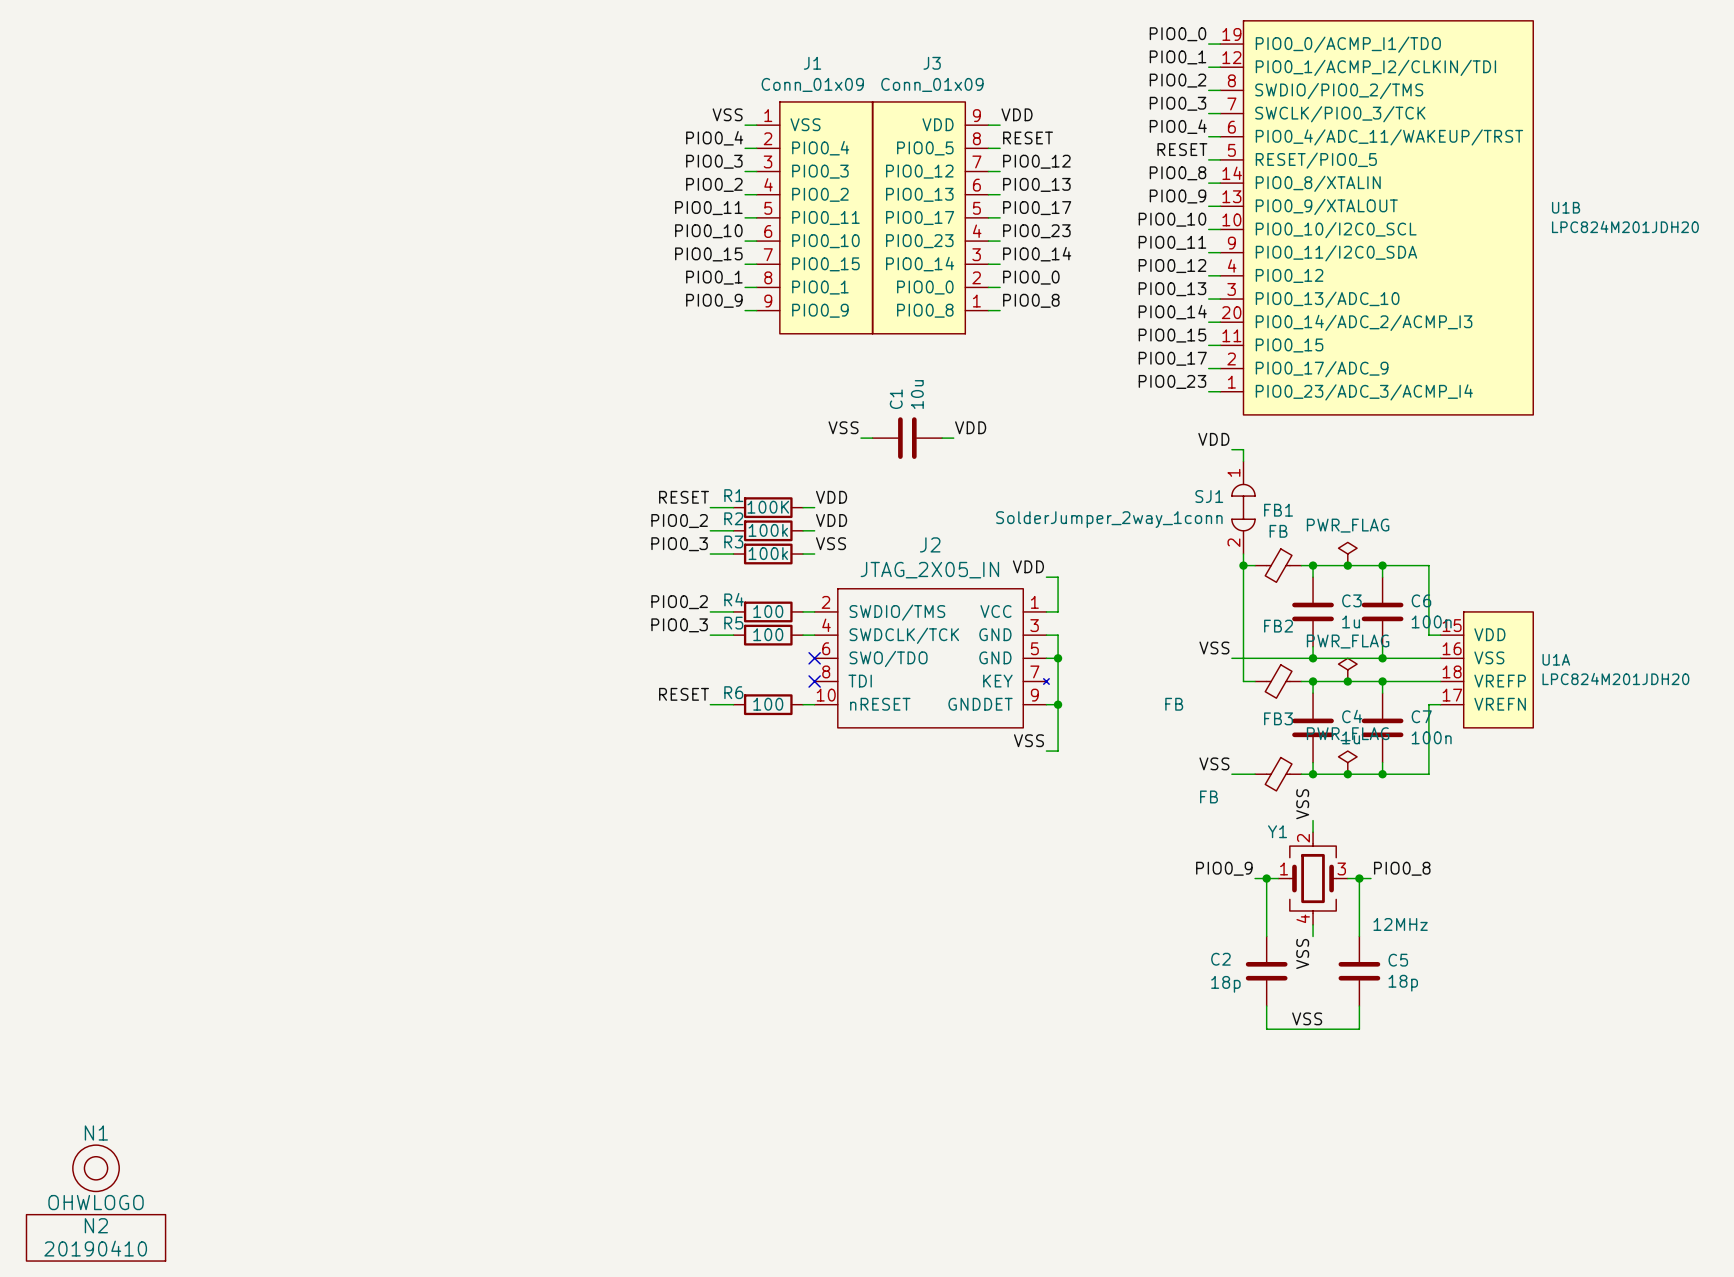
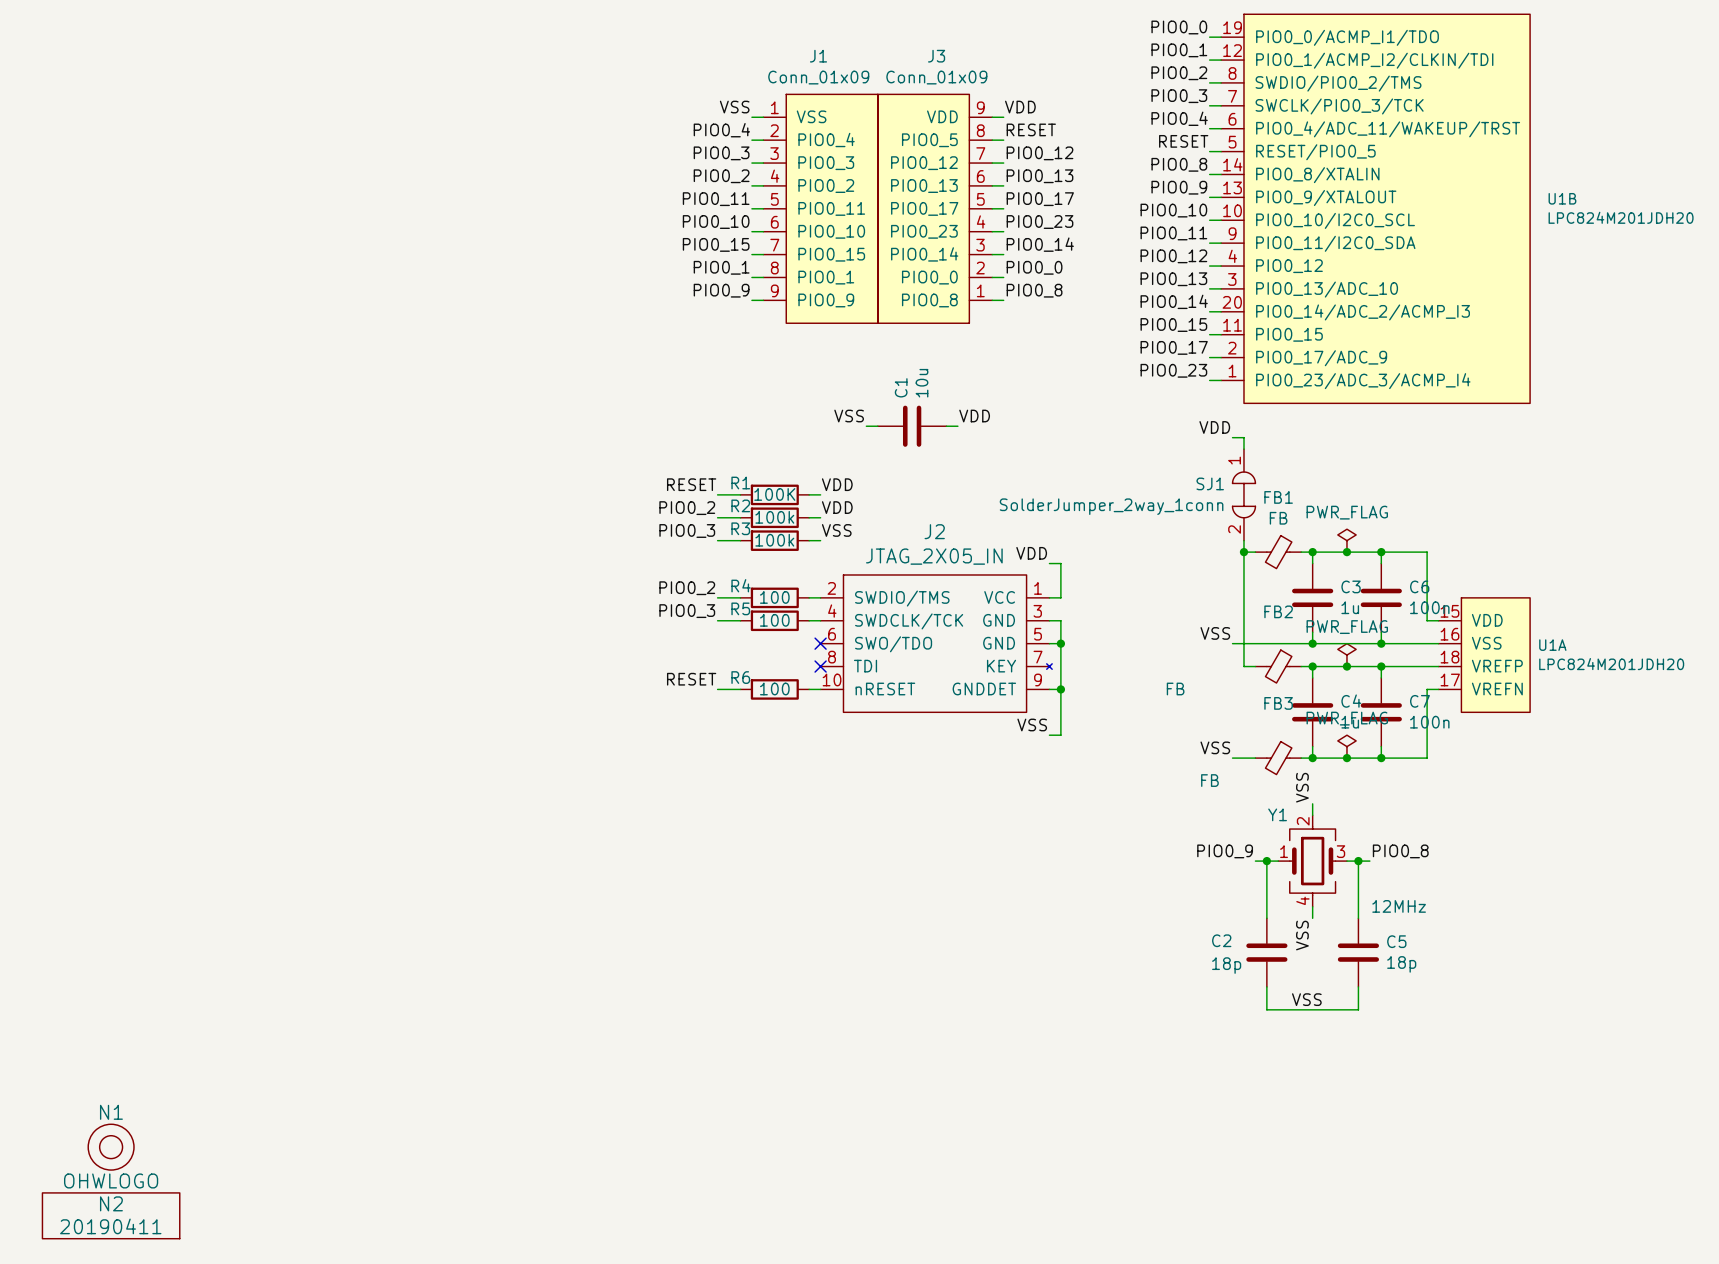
N2 value: 20190410 (95, 1248) -> 20190411 (110, 1226)

